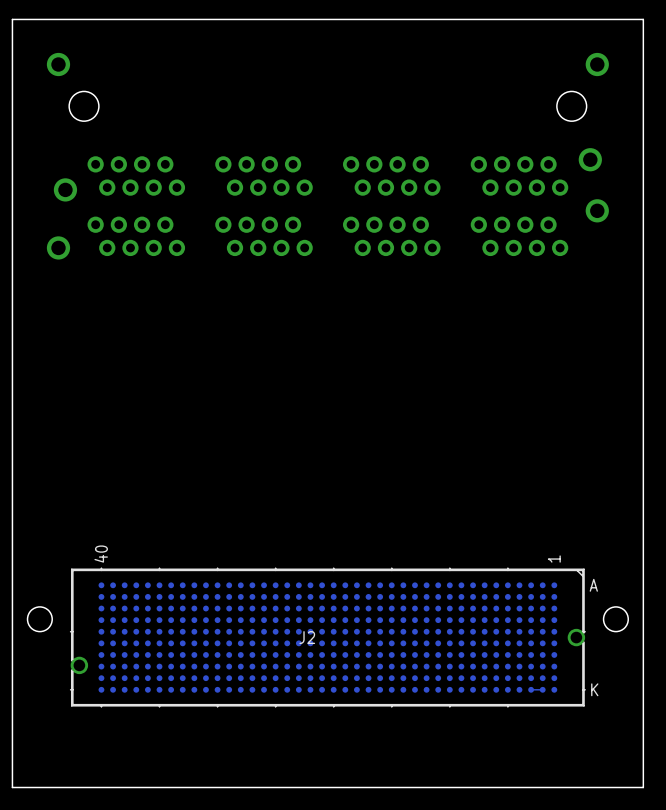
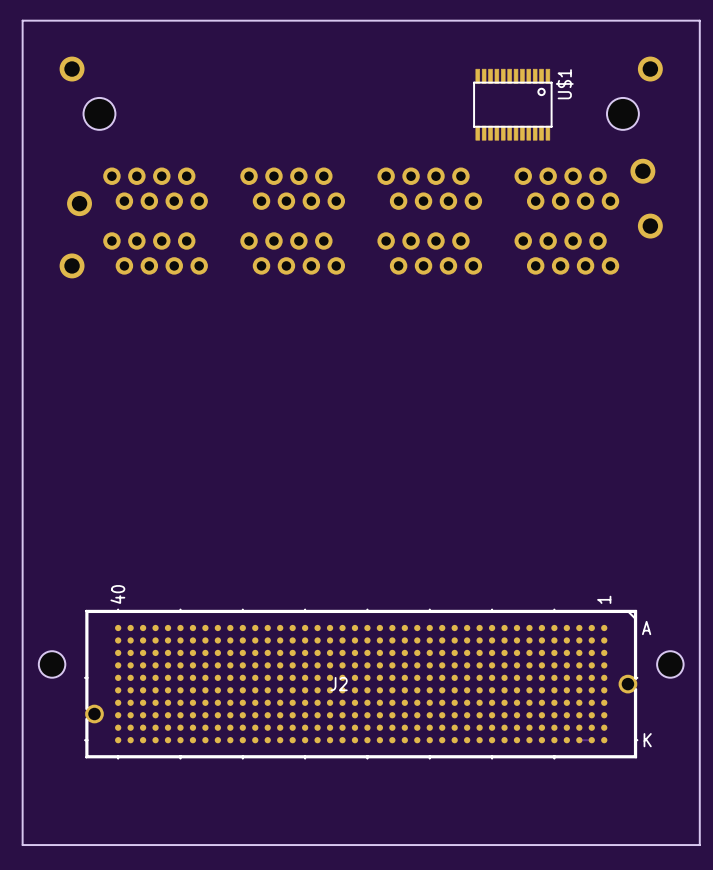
U$1: none -> (512, 104)

